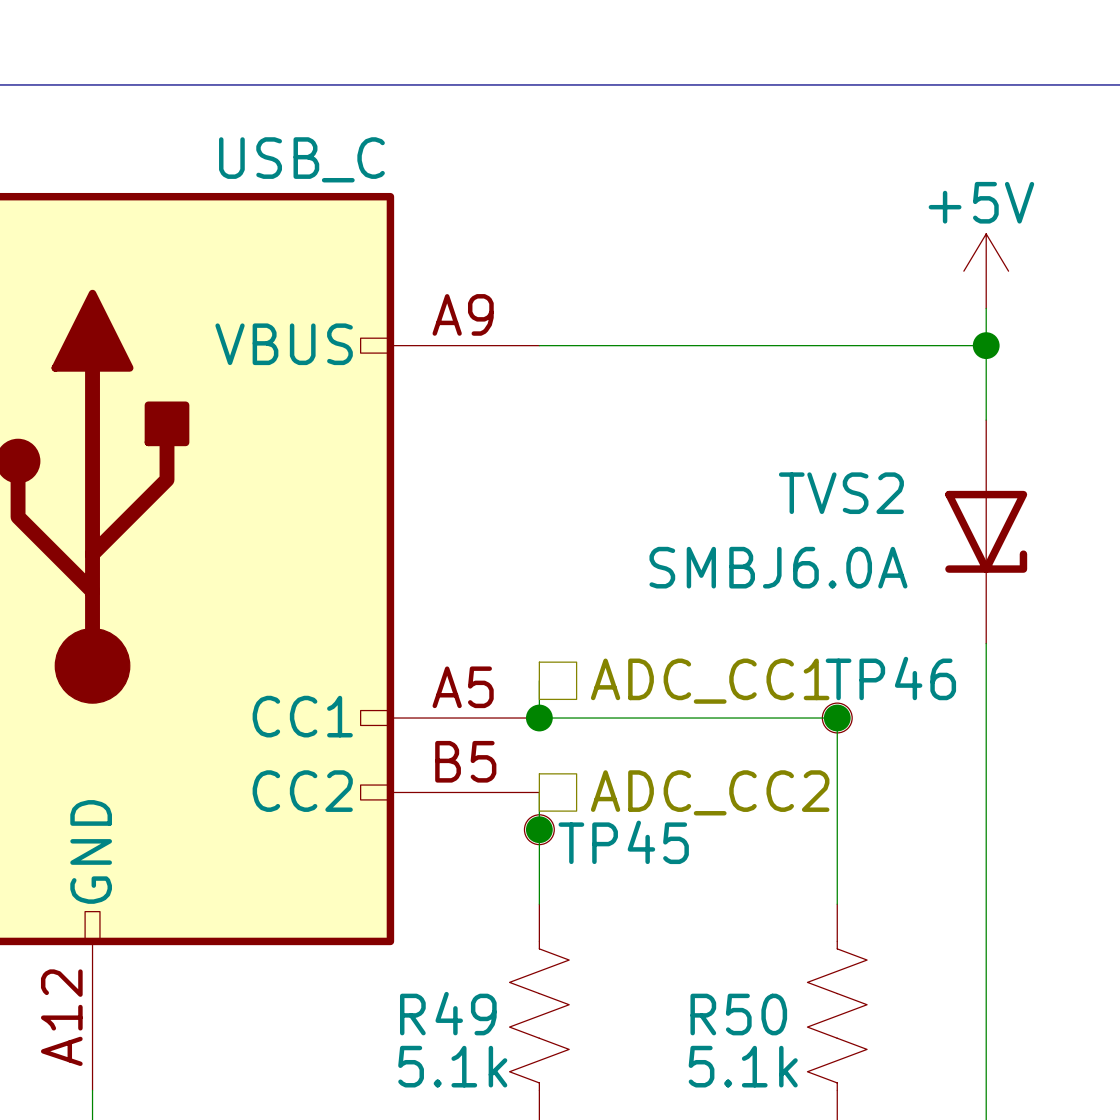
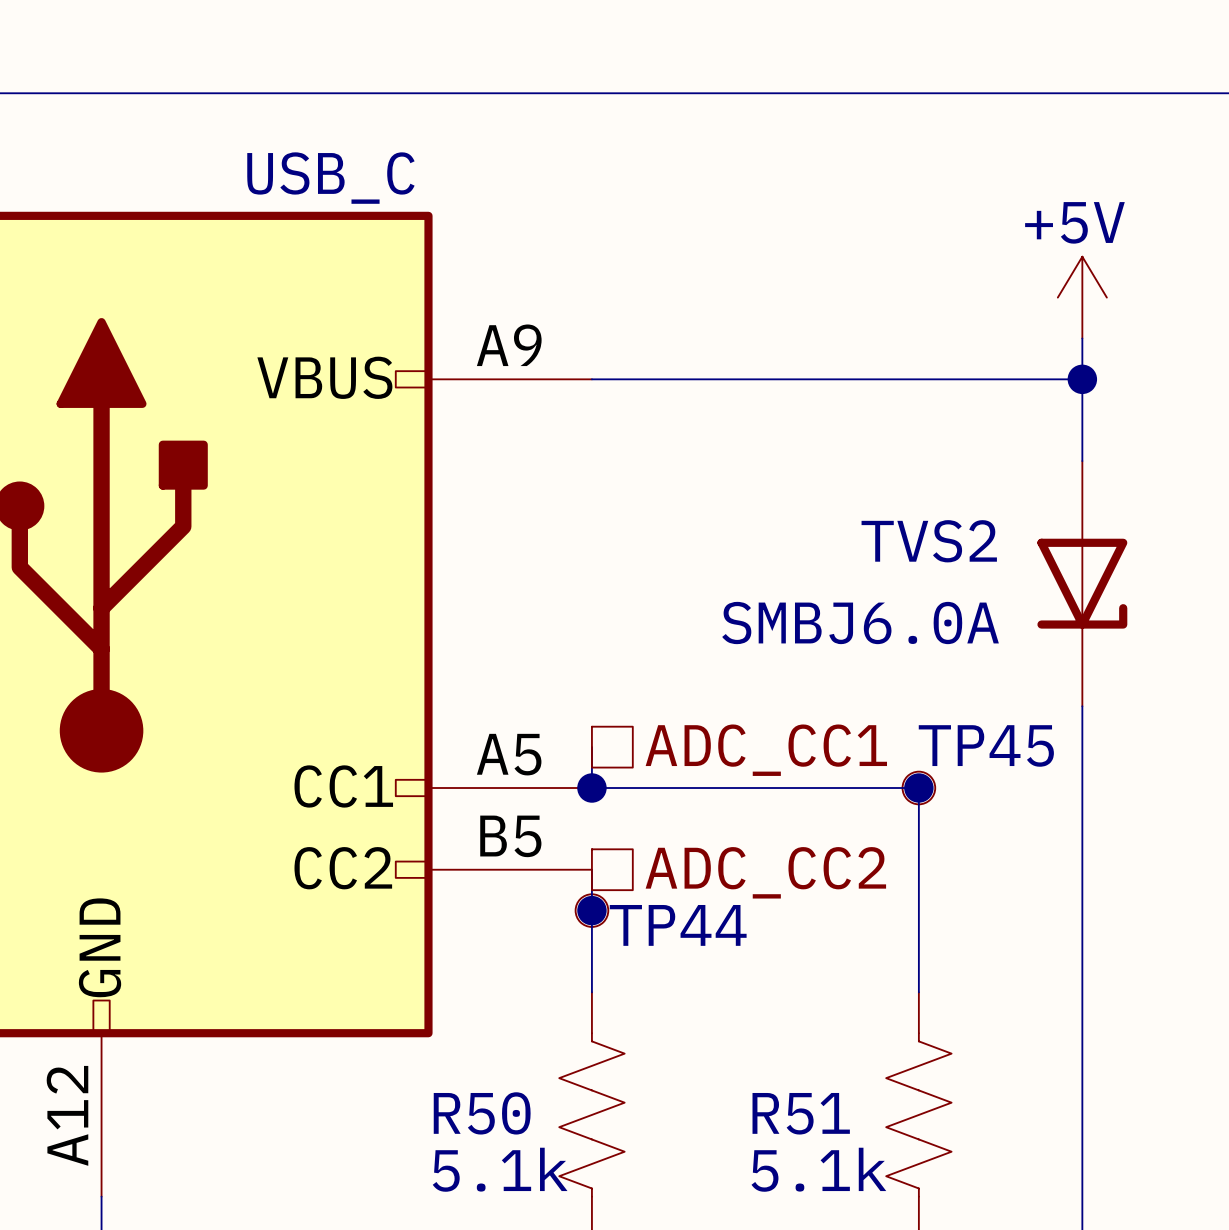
TP46 name: TP46 (890, 678) -> TP45 (986, 745)
TP45 name: TP45 (623, 842) -> TP44 (678, 925)
R49 name: R49 (448, 1013) -> R50 (482, 1113)
R50 name: R50 (738, 1014) -> R51 (801, 1113)

